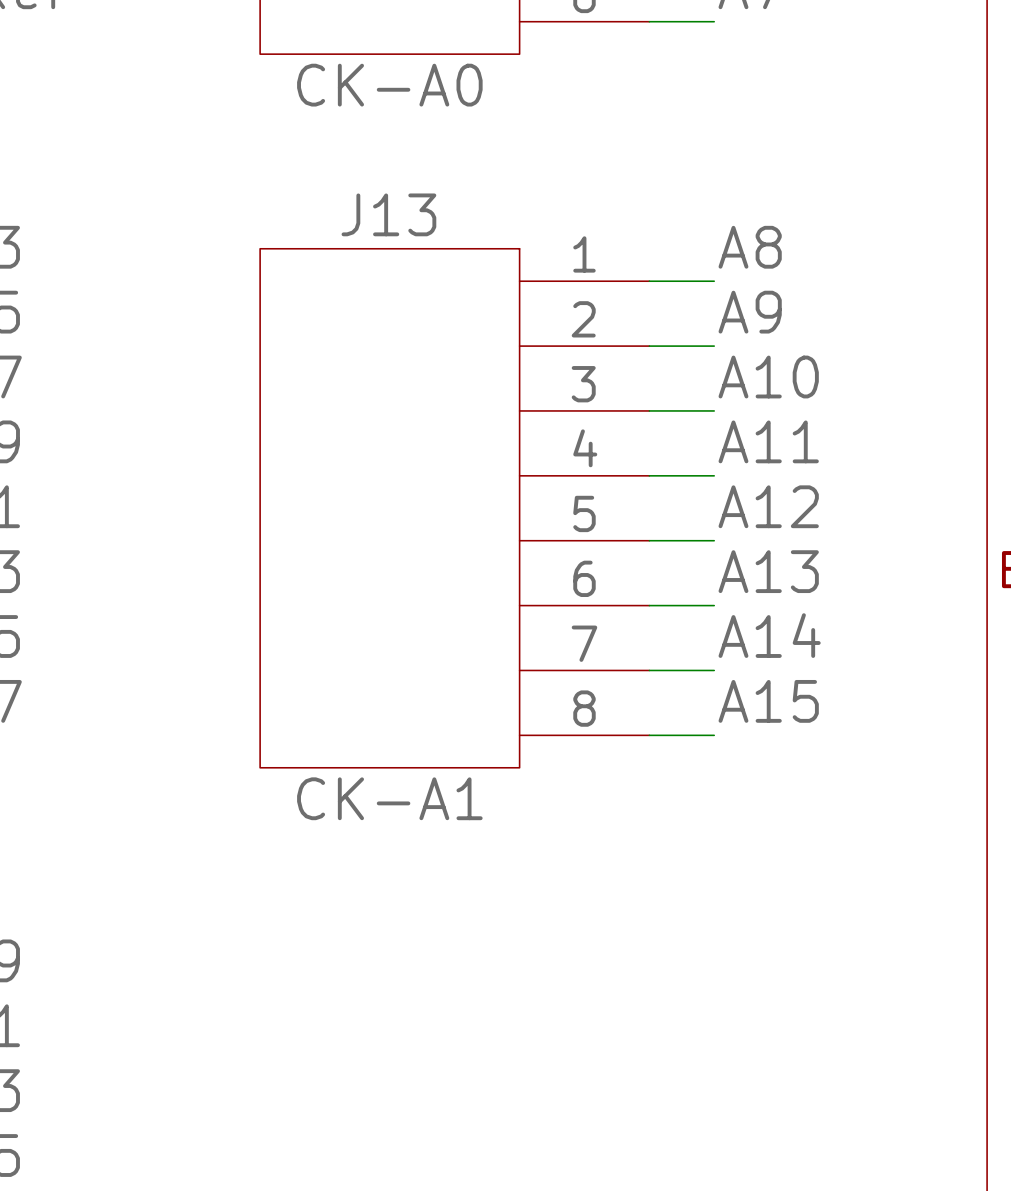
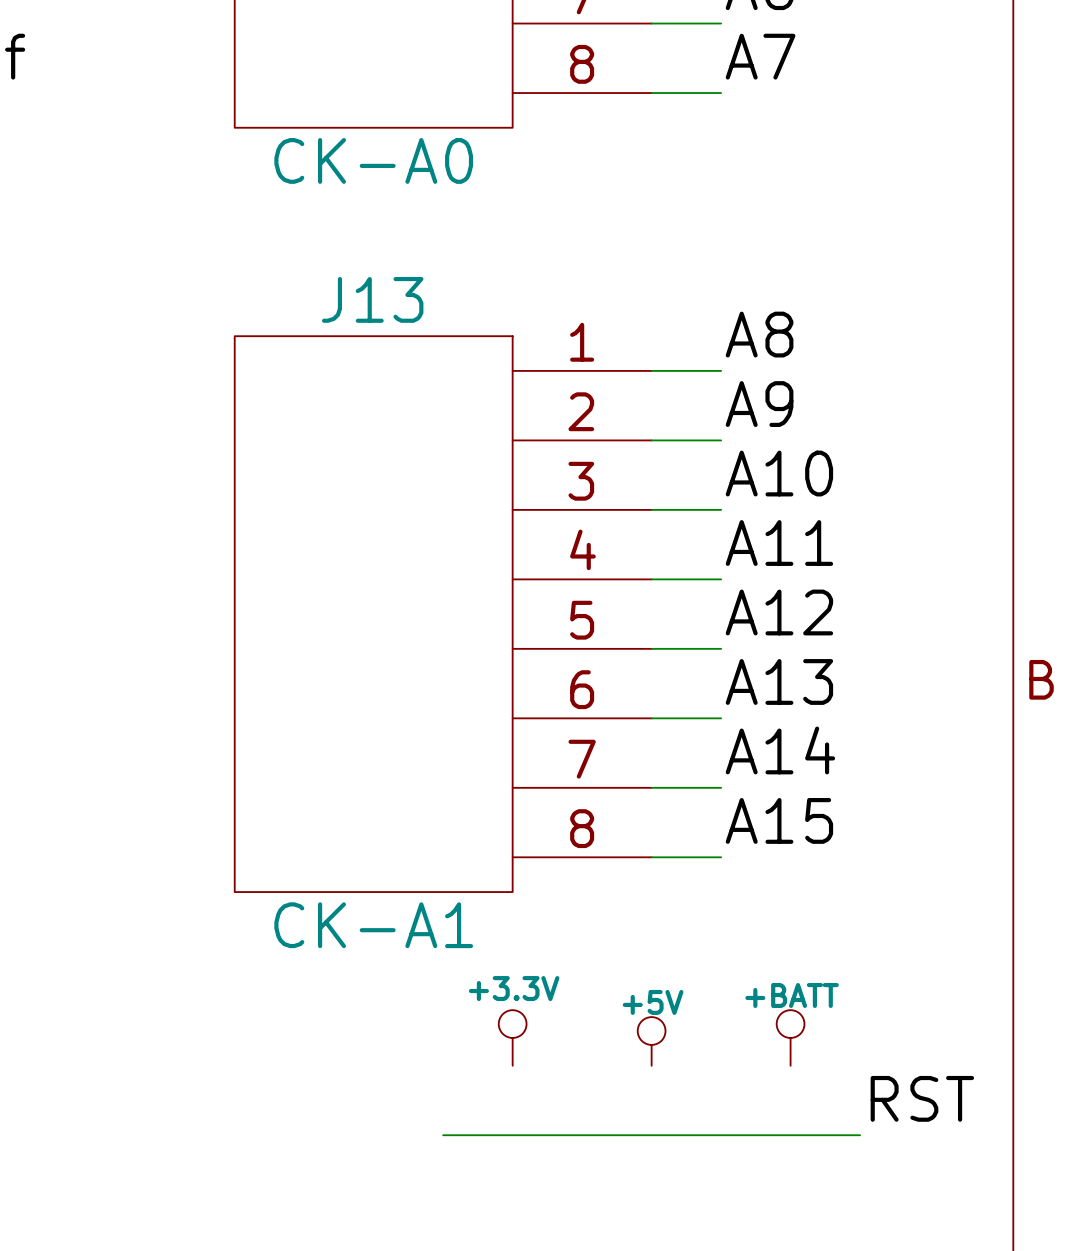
power symbol: none -> +3.3V (512, 1037)
power symbol: none -> +BATT (790, 1037)
power symbol: none -> +5V (651, 1041)
label: none -> RST (922, 1098)
wire: none -> (443, 1135) (860, 1135)

